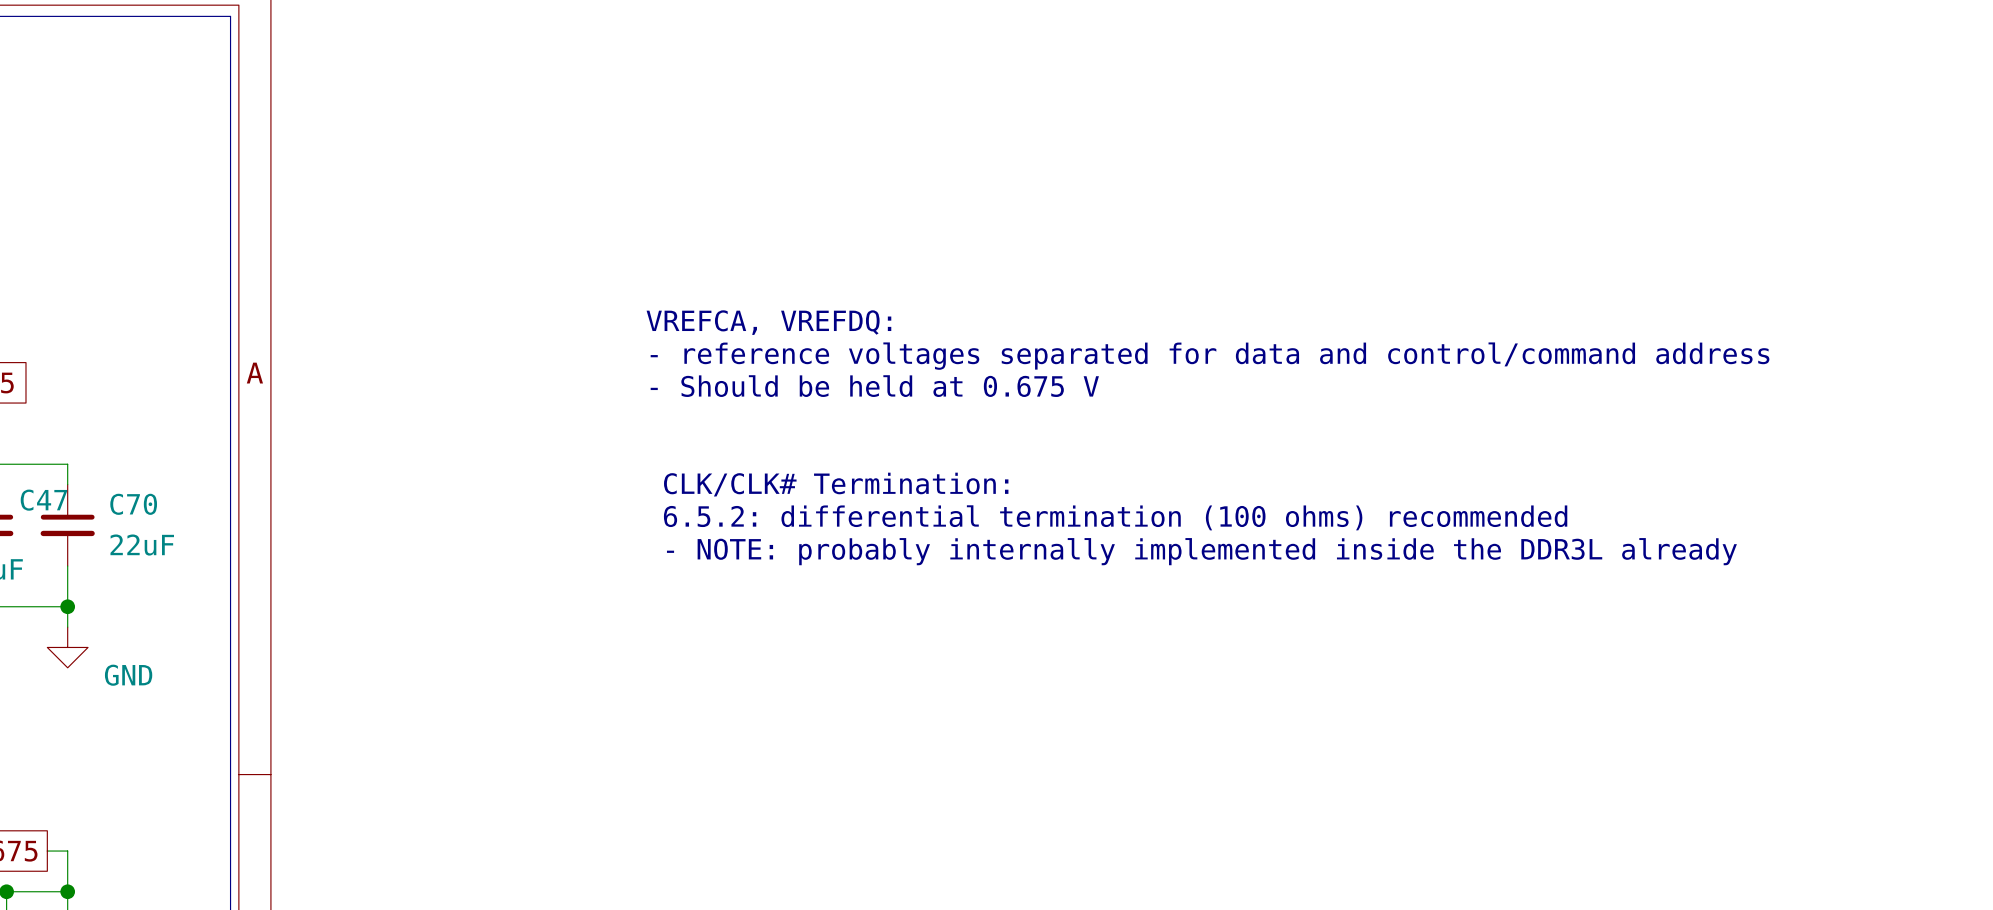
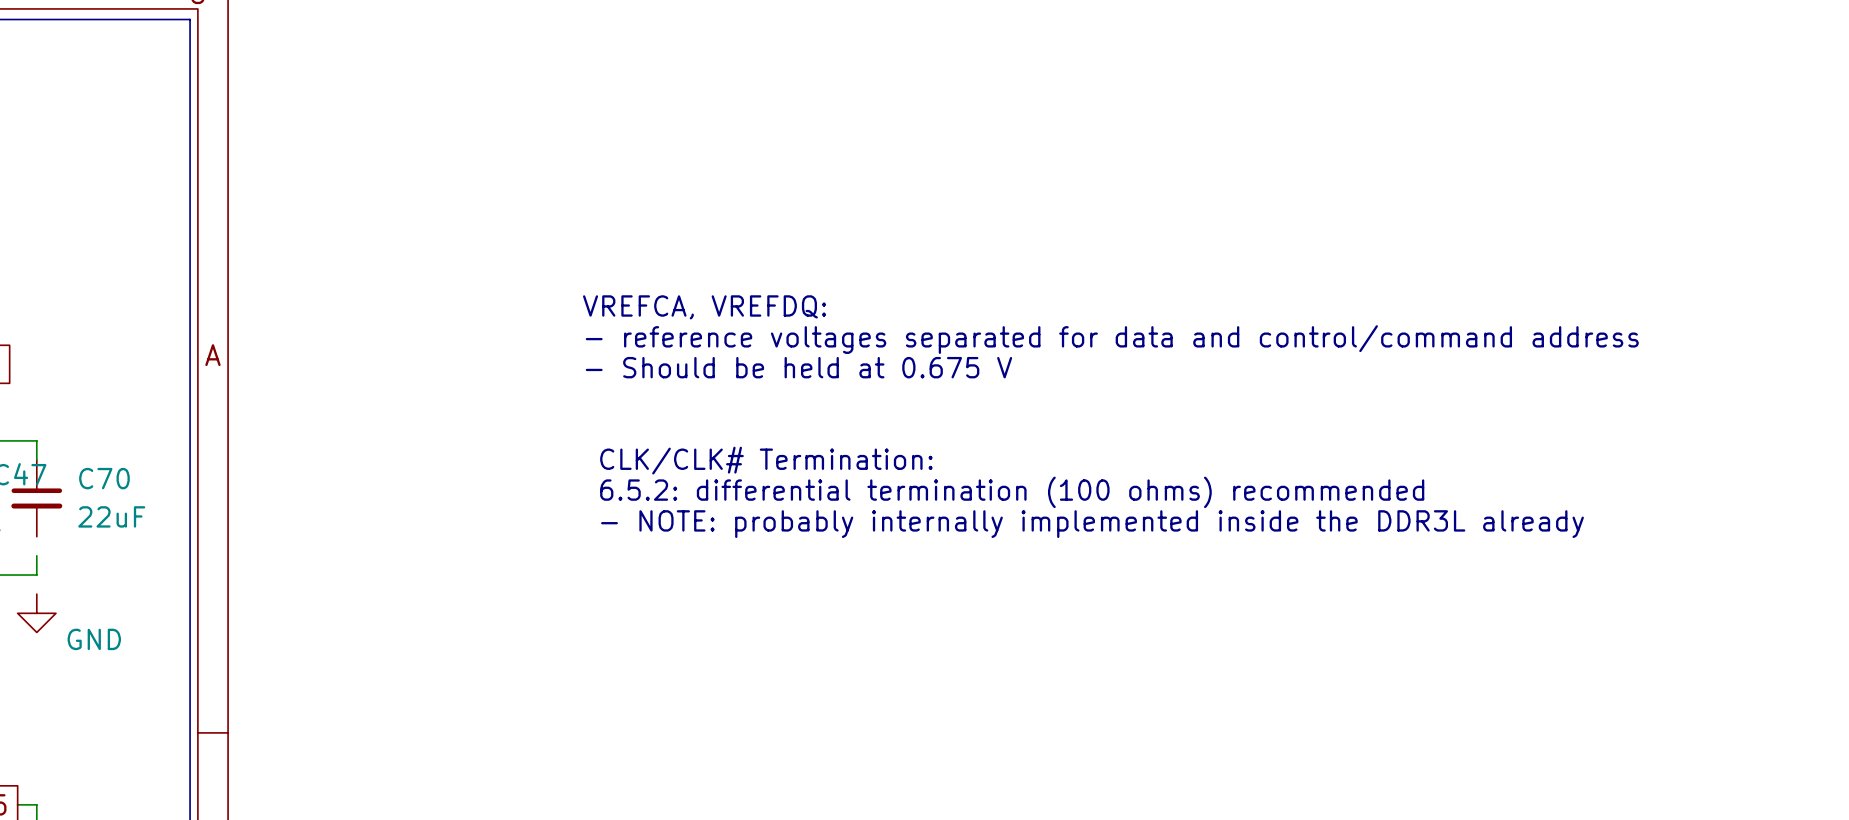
wire: (67, 566) (67, 586) -> none
wire: (67, 606) (67, 627) -> none
junction: (67, 606) -> none

